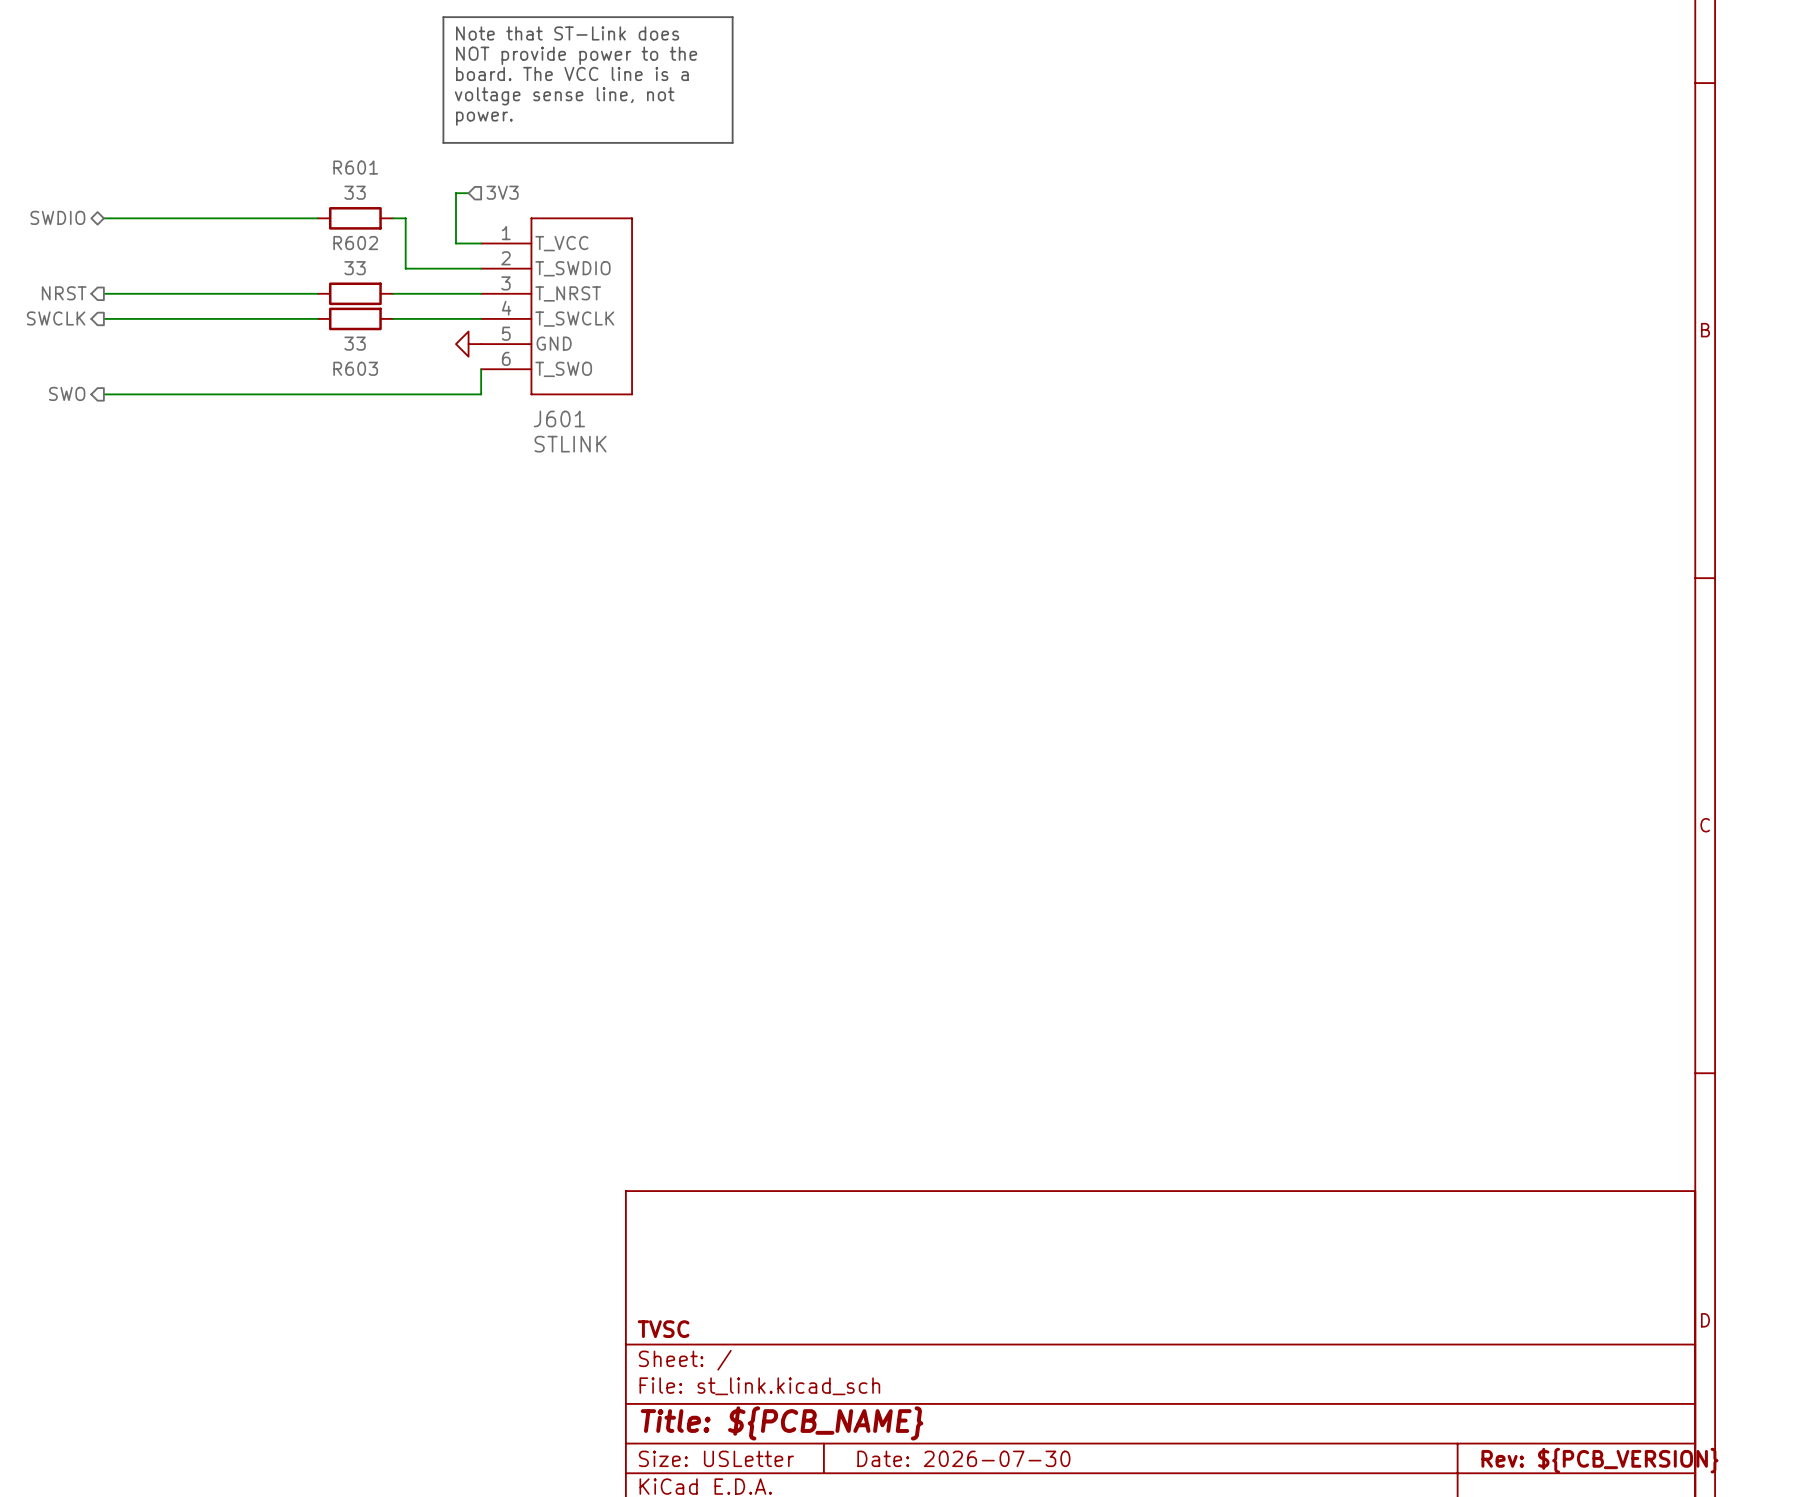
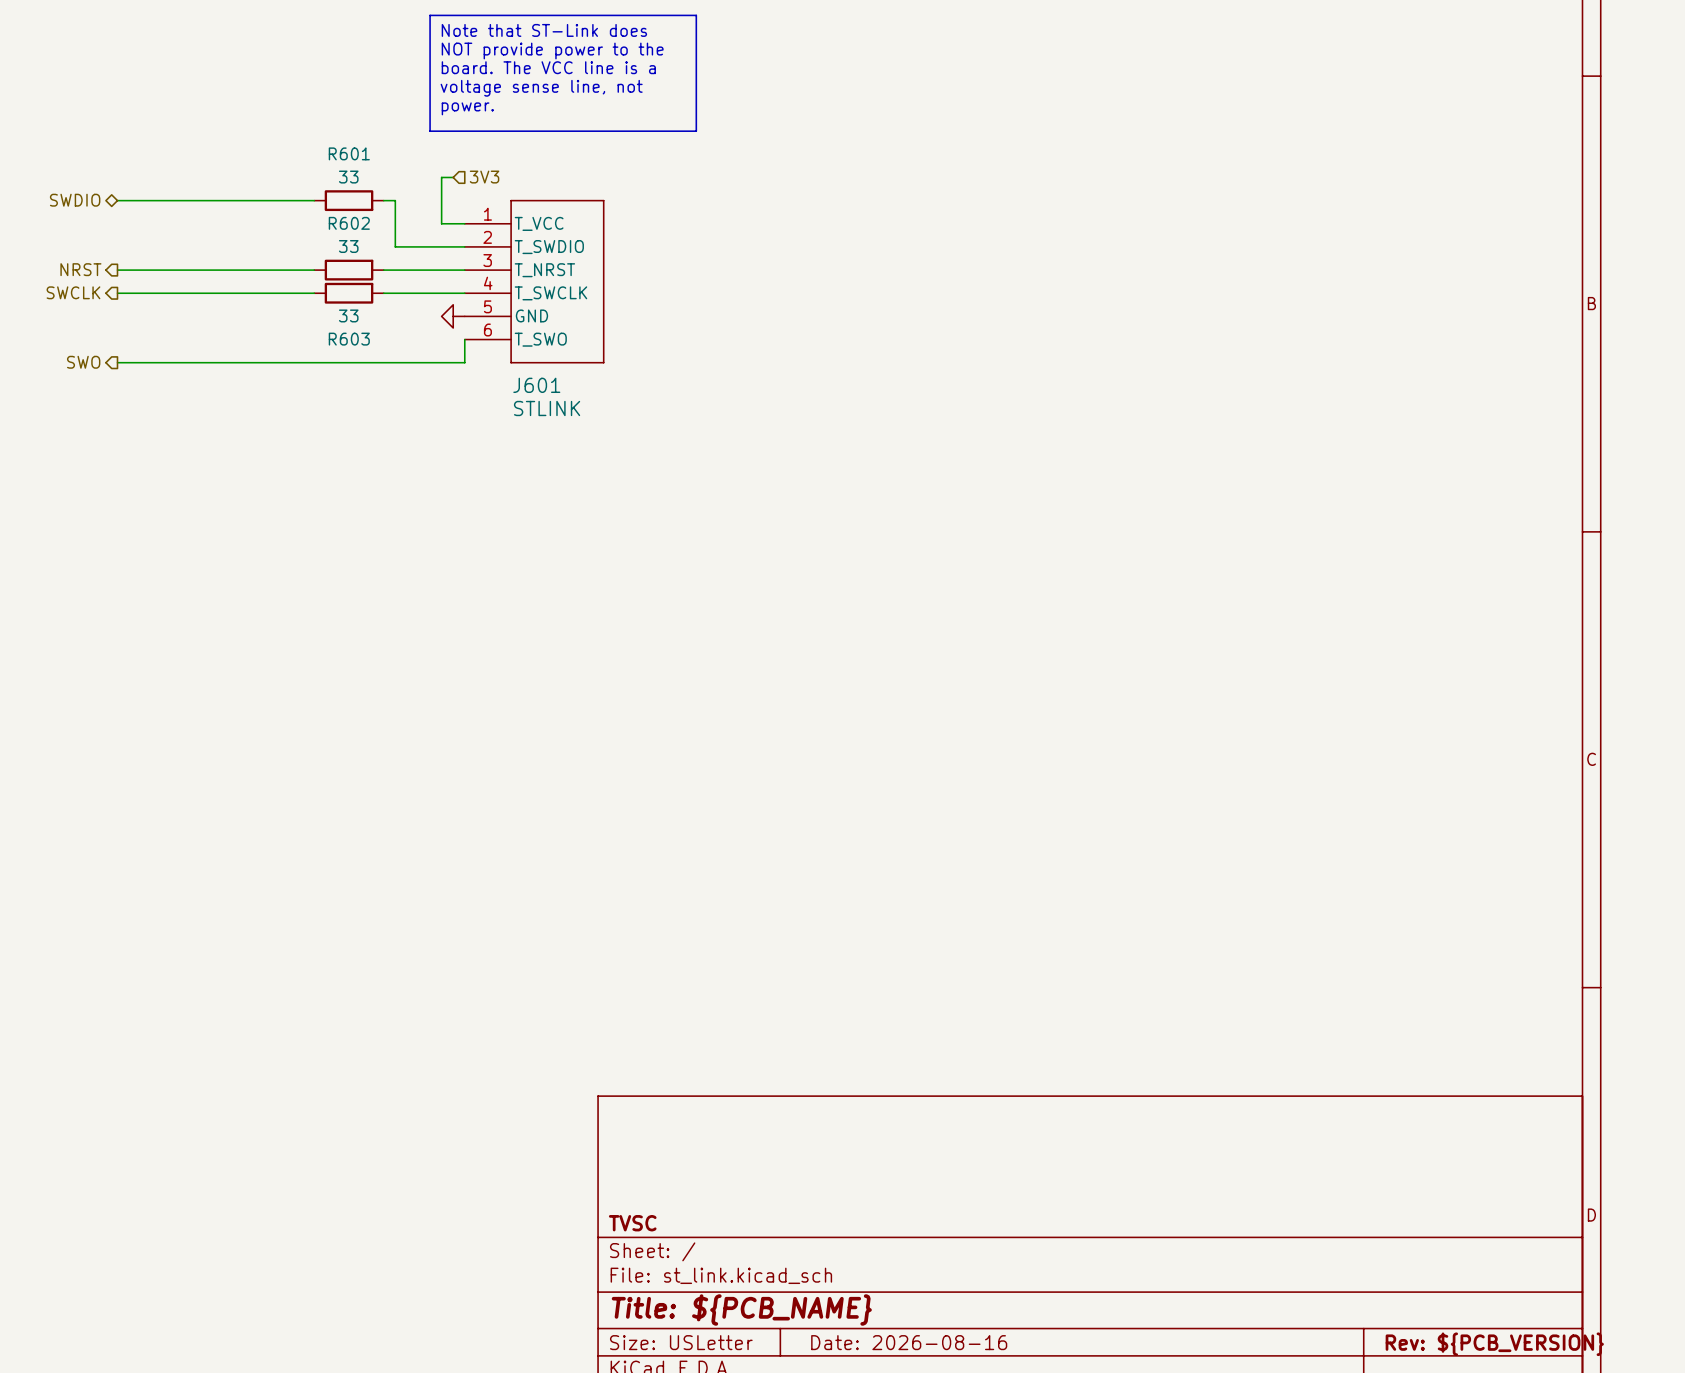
title block: Date: 2026-07-30 (963, 1458) -> Date: 2026-08-16 (909, 1342)

